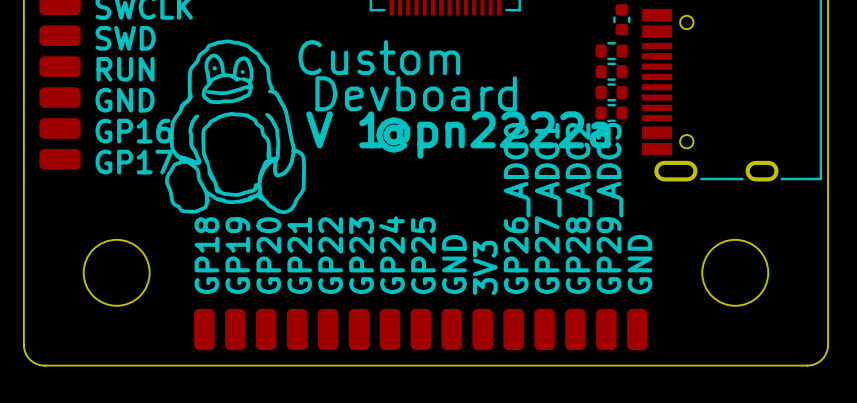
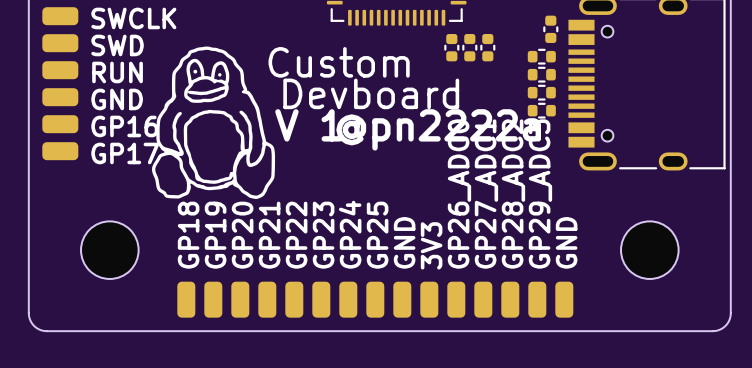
part: none -> (451, 47)
part: none -> (469, 47)
part: none -> (487, 47)

